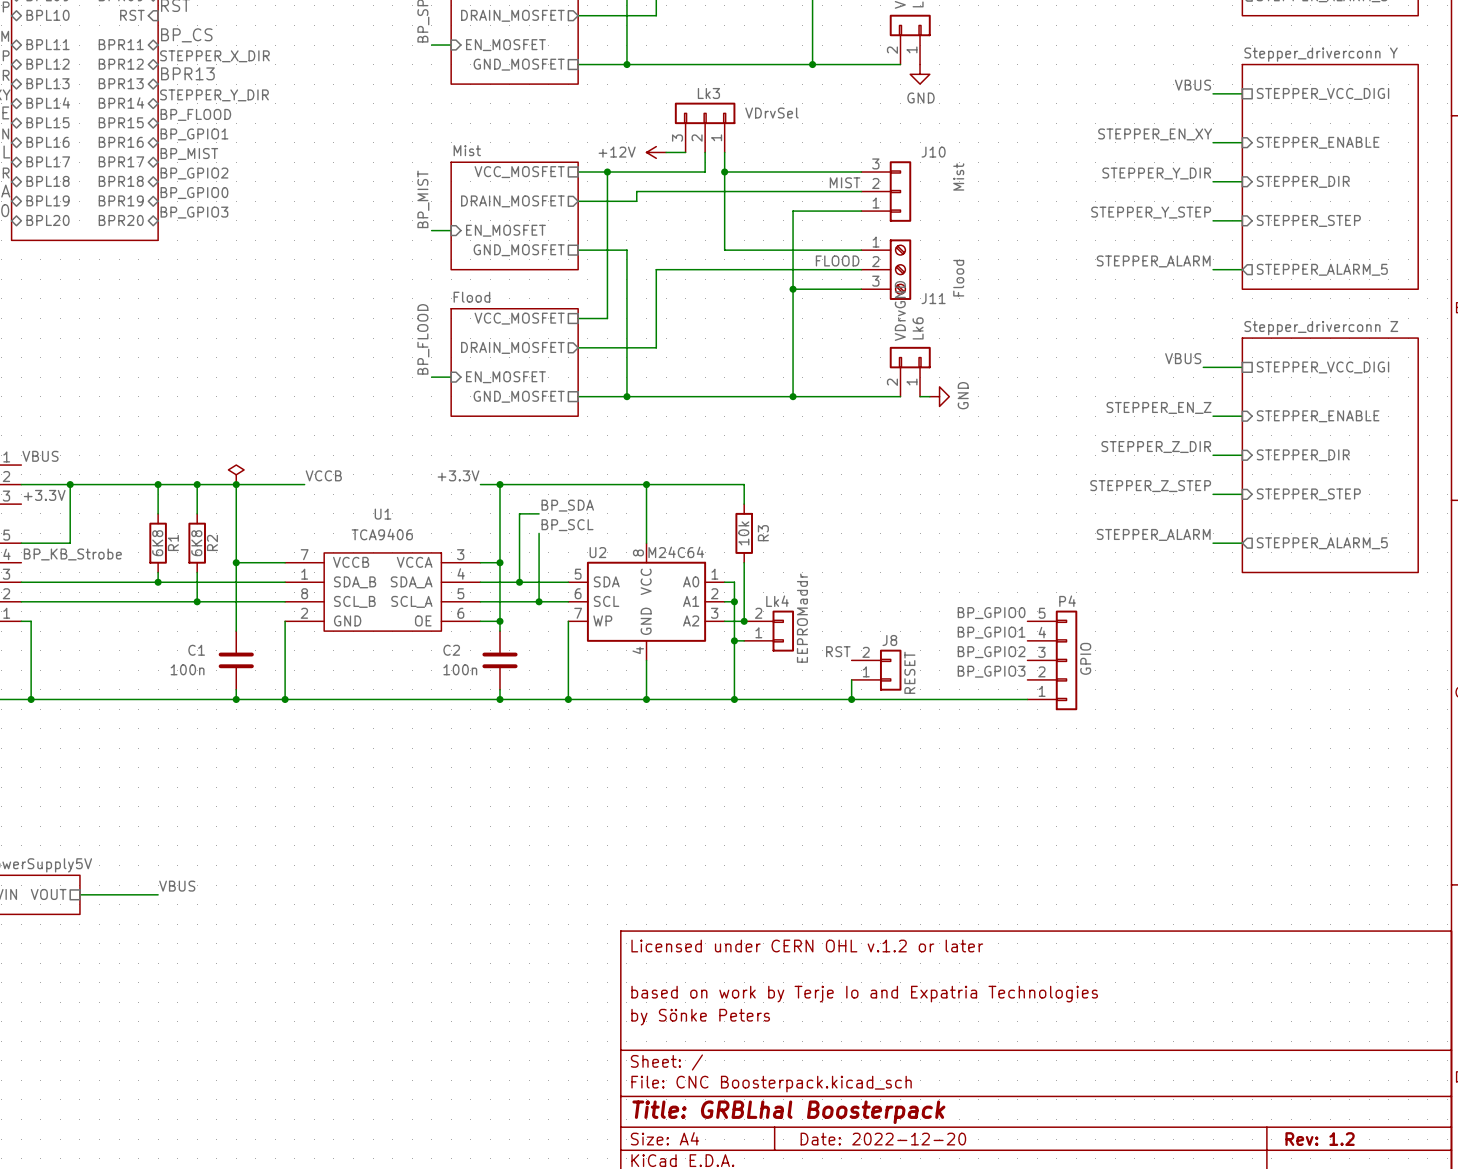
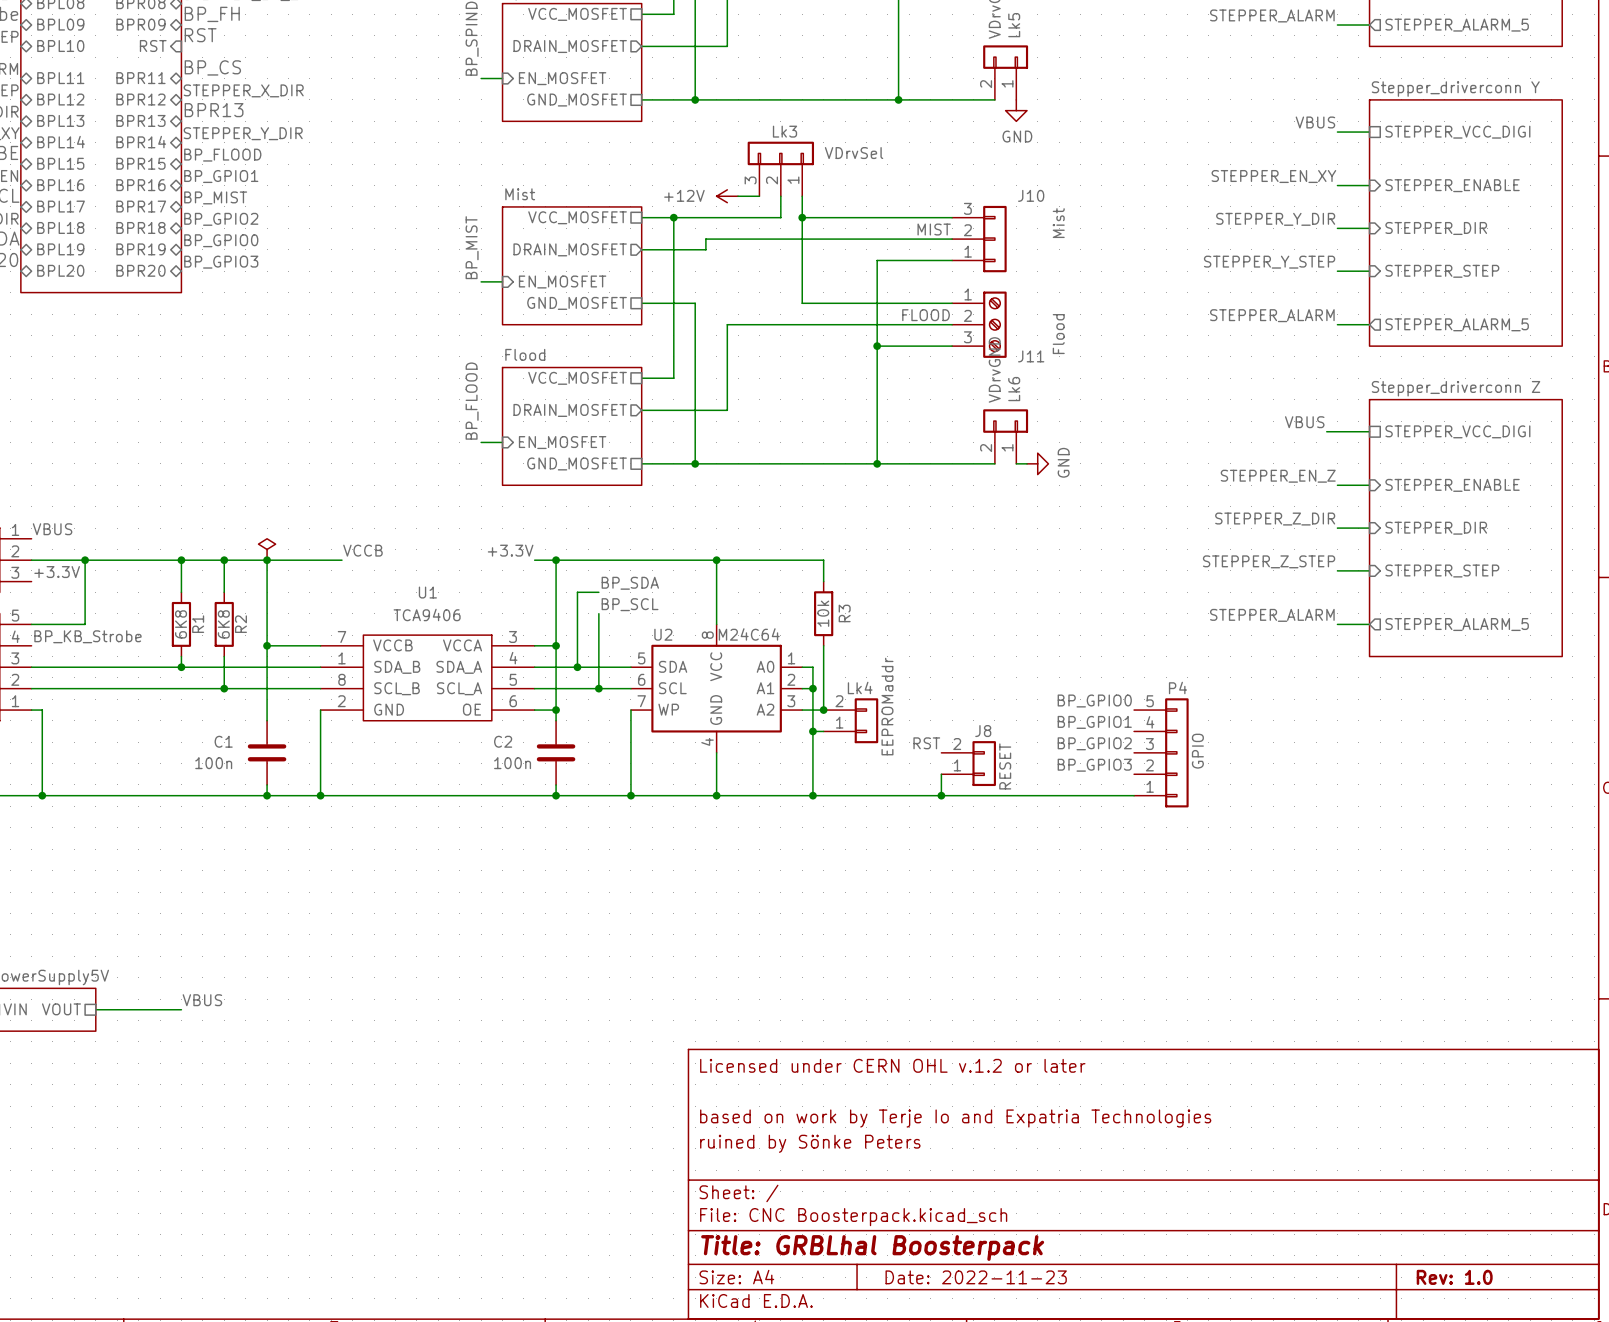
title block: by Sönke Peters (700, 1017) -> ruined by Sönke Peters (810, 1143)
title block: Date: 2022-12-20 (883, 1139) -> Date: 2022-11-23 (976, 1277)
title block: Rev: 1.2 (1320, 1139) -> Rev: 1.0 (1454, 1277)

